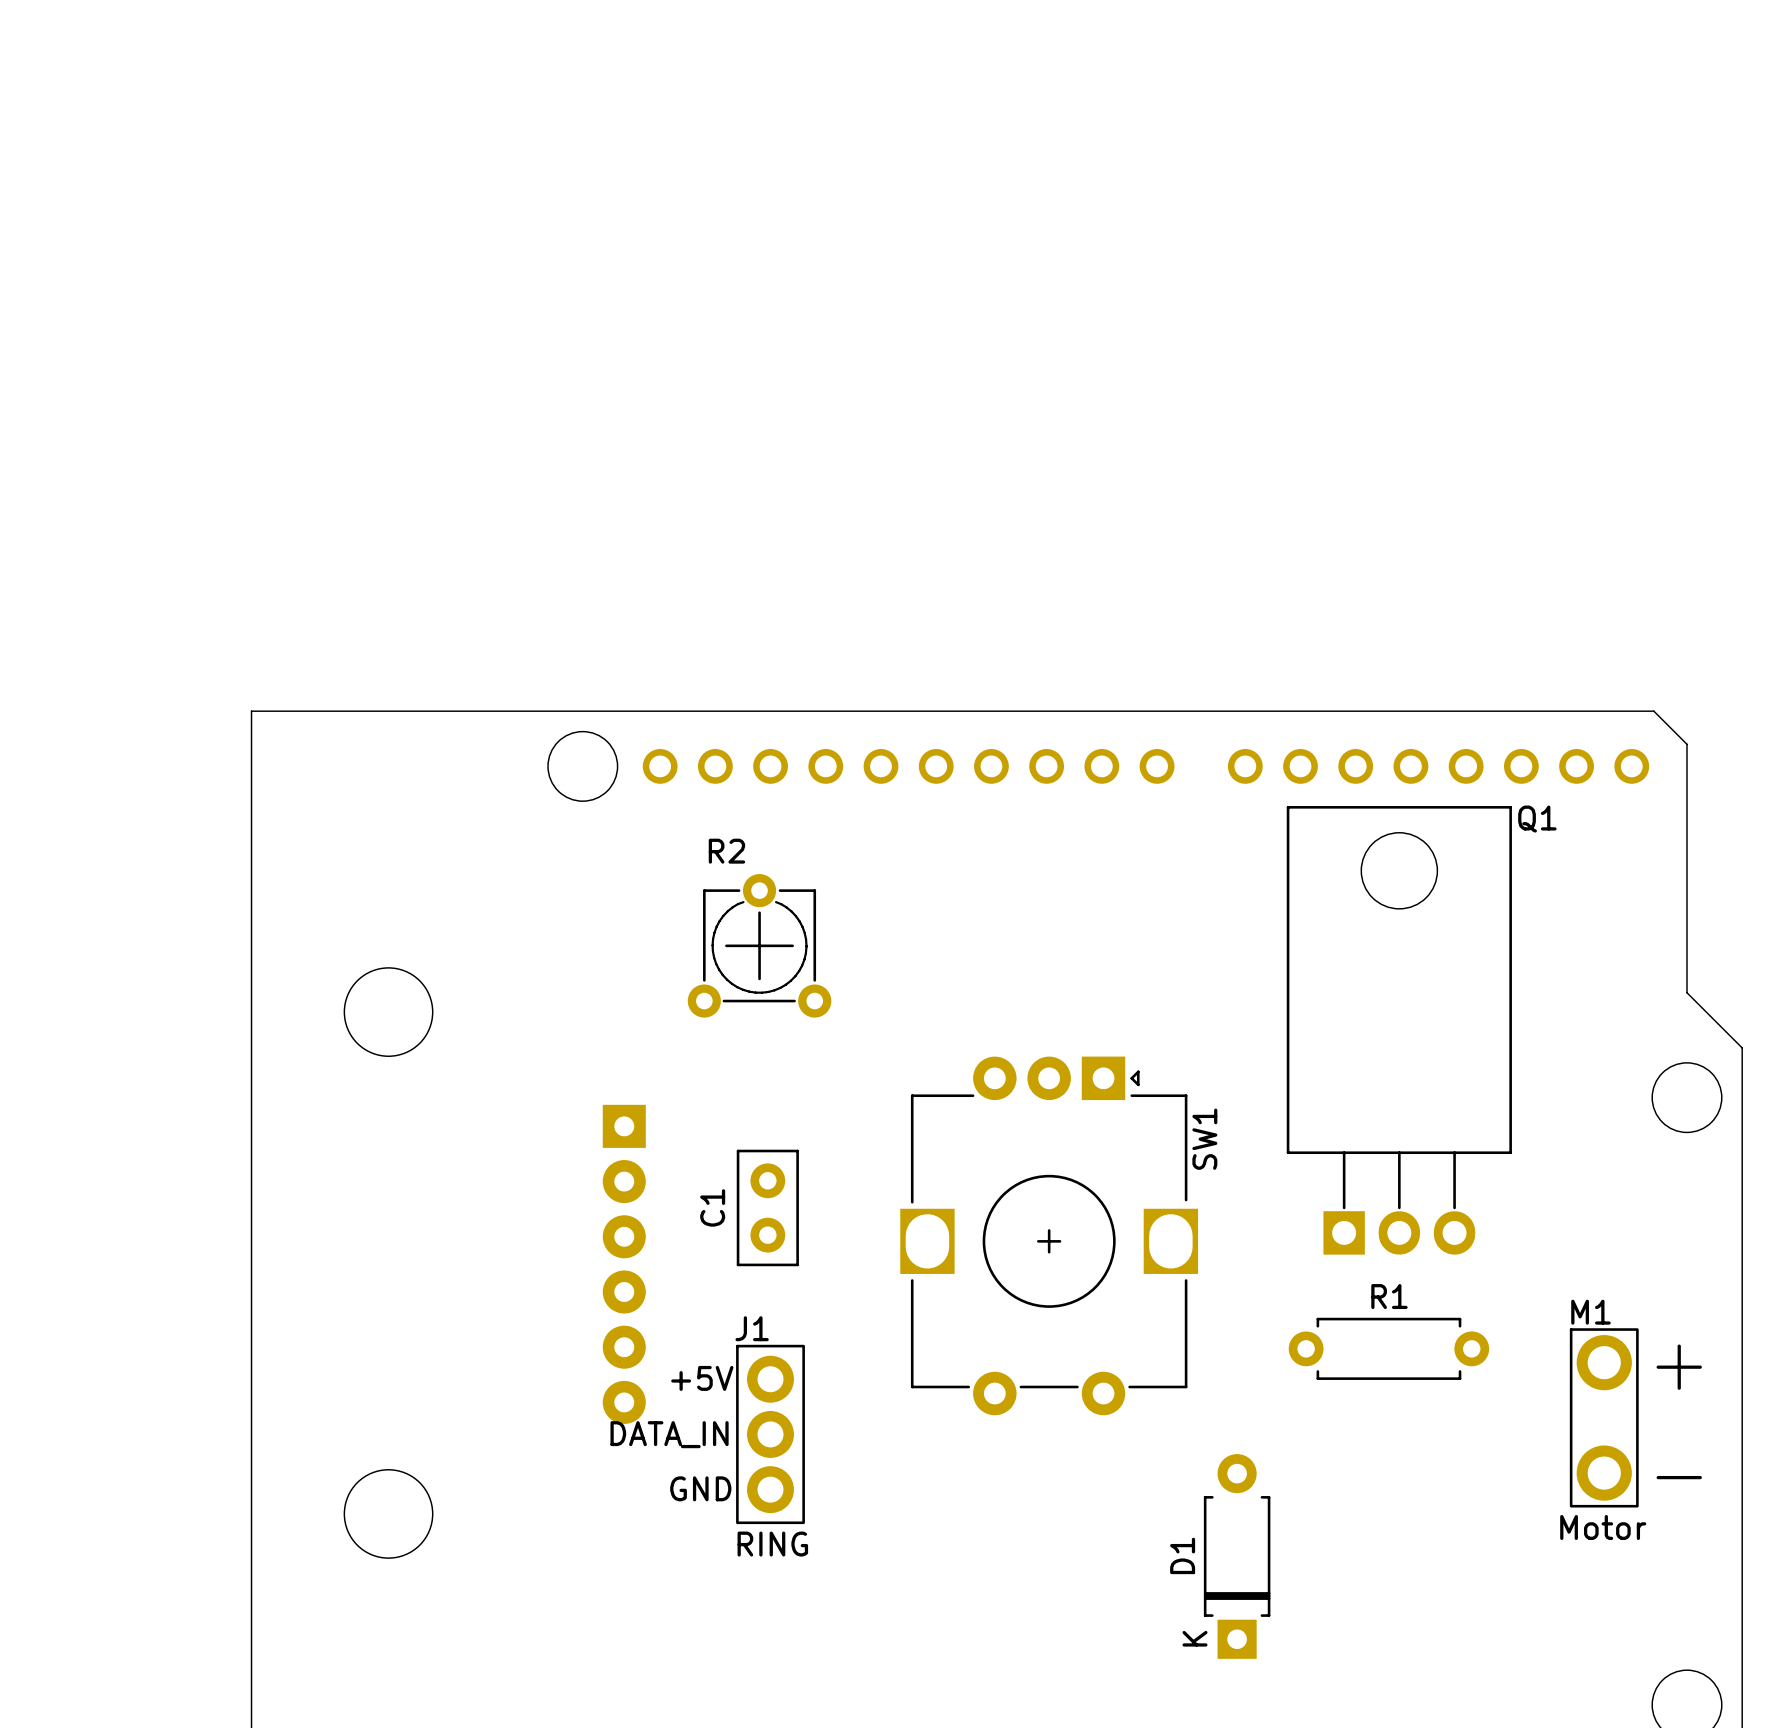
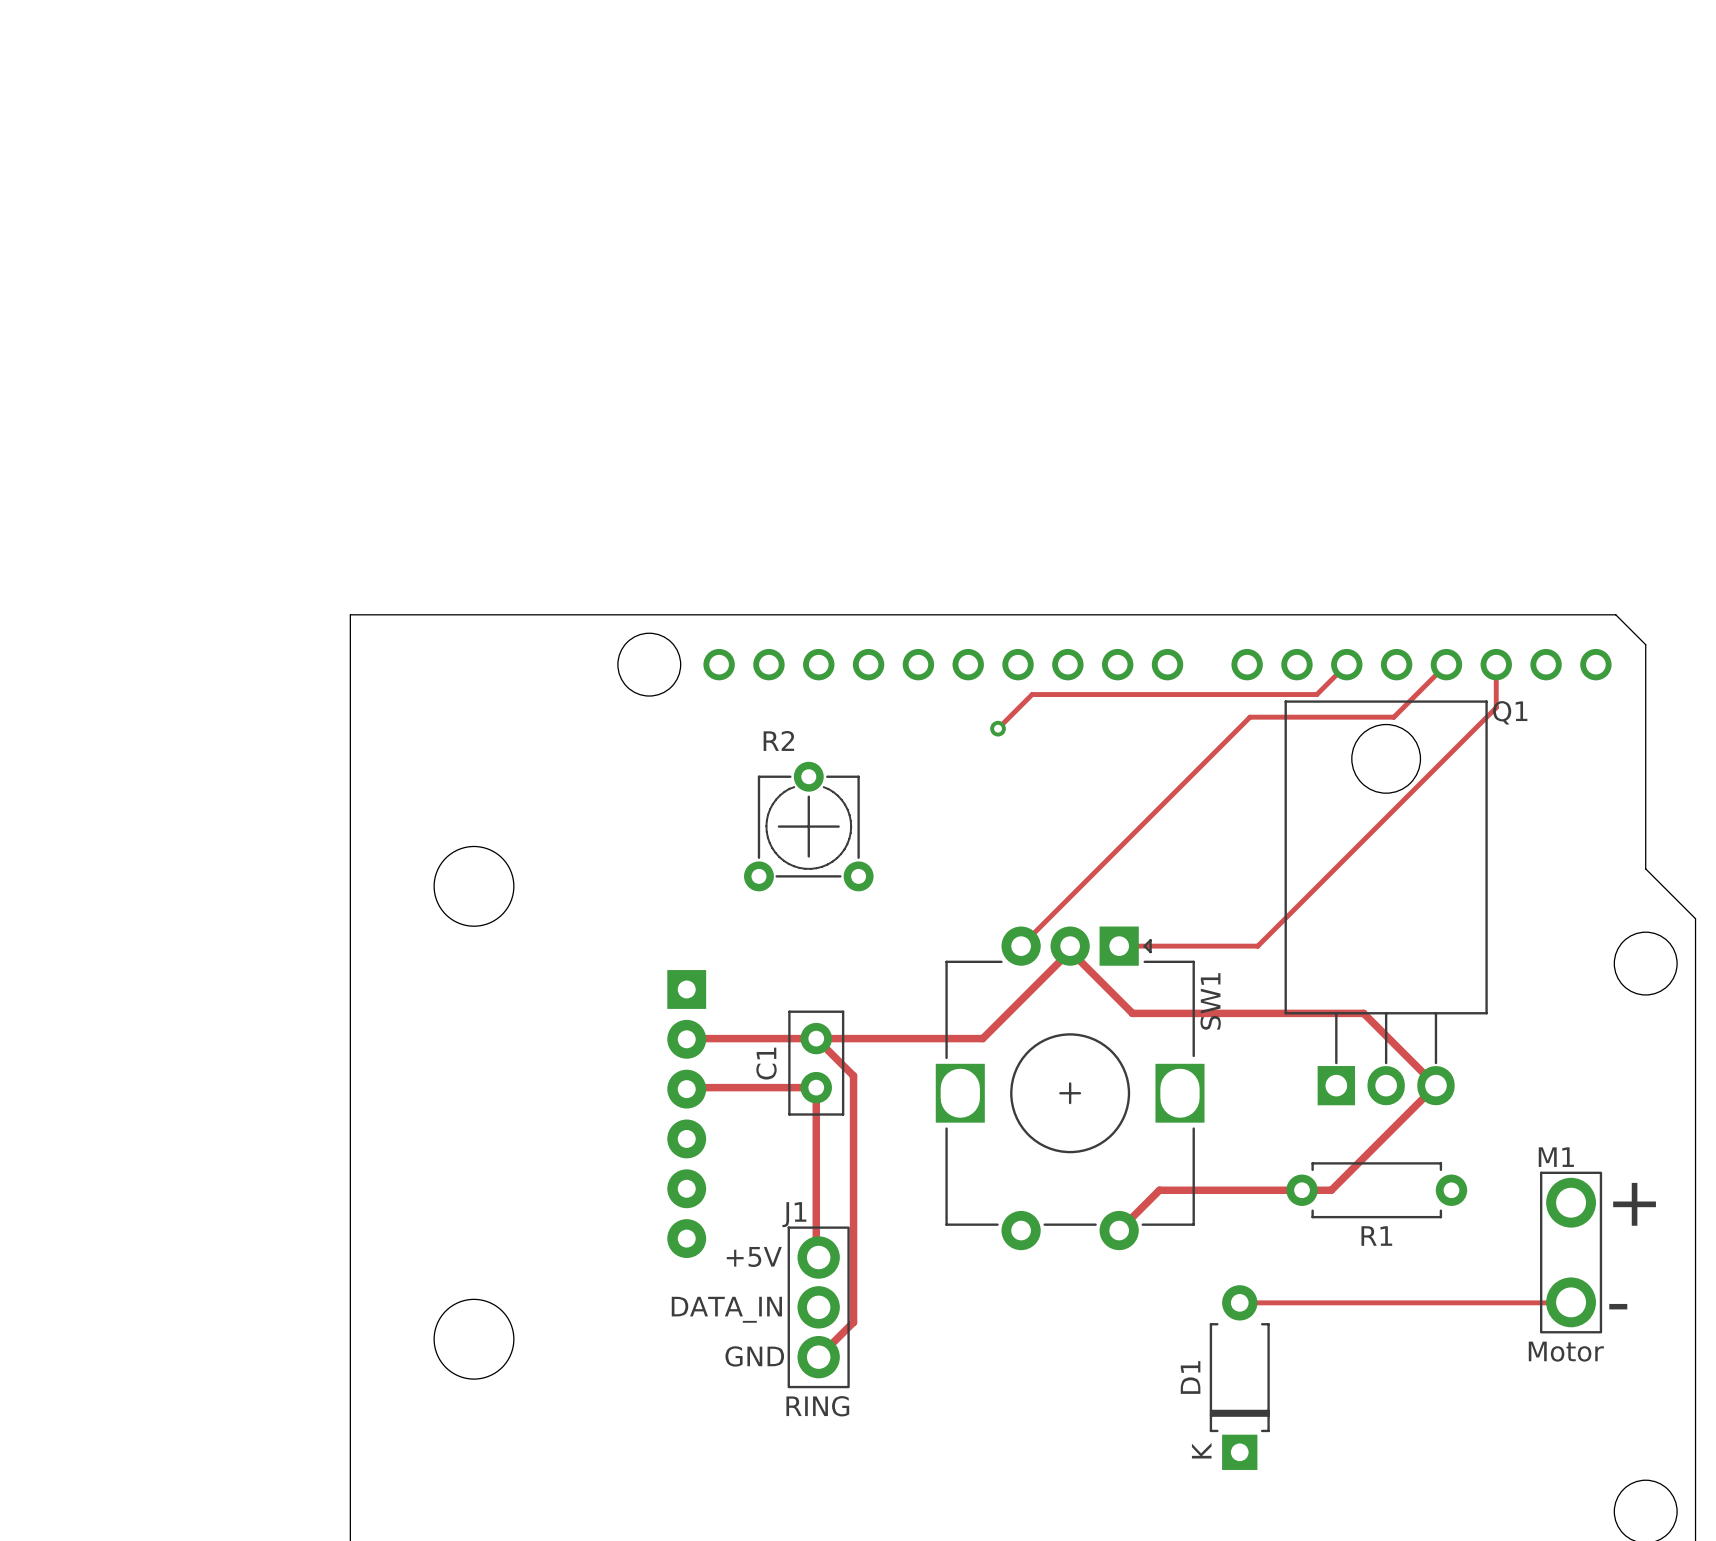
track: none -> (1346, 664) (1316, 694) (1032, 694) (998, 728)
track: none -> (1446, 664) (1393, 717) (1250, 717) (1021, 946)
track: none -> (1496, 664) (1496, 707) (1257, 946) (1119, 946)
via: none -> (998, 728)
track: none -> (1070, 946) (1070, 951) (982, 1038) (686, 1039)
track: none -> (1070, 950) (1132, 1013) (1363, 1013) (1435, 1085) (1331, 1190) (1159, 1190) (1119, 1230)
track: none -> (816, 1038) (853, 1075) (853, 1322) (818, 1357)
track: none -> (686, 1089) (816, 1087) (816, 1255) (818, 1257)
R1 name position: R1 (1389, 1296) -> R1 (1376, 1236)
J1 position: (770, 1434) -> (818, 1307)
track: none -> (1571, 1302) (1239, 1302)

